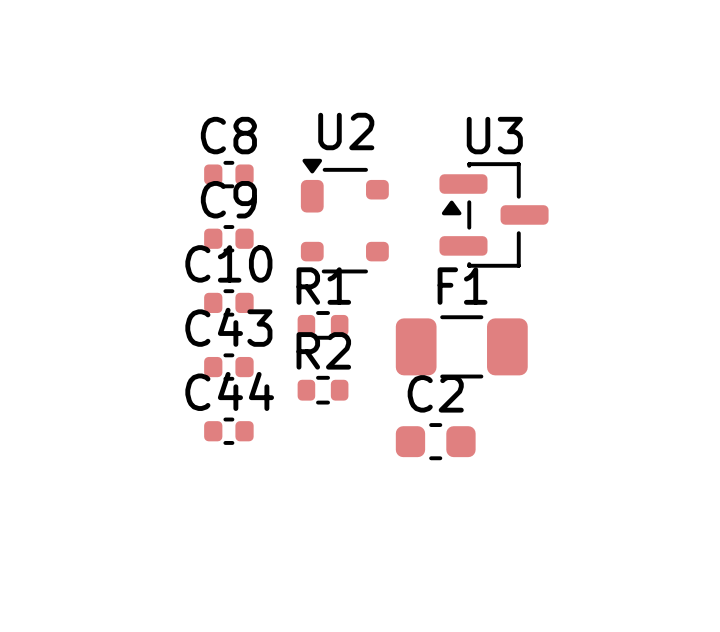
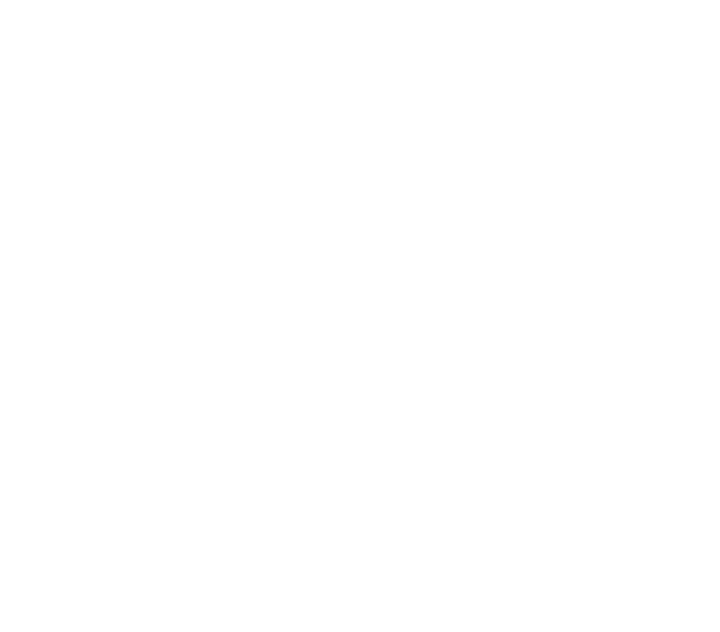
C8: (228, 174) -> none
U3: (494, 214) -> none
U2: (344, 216) -> none
C9: (228, 238) -> none
C10: (228, 302) -> none
R1: (323, 325) -> none
F1: (461, 346) -> none
C43: (228, 367) -> none
R2: (323, 390) -> none
C44: (228, 431) -> none
C2: (435, 441) -> none

